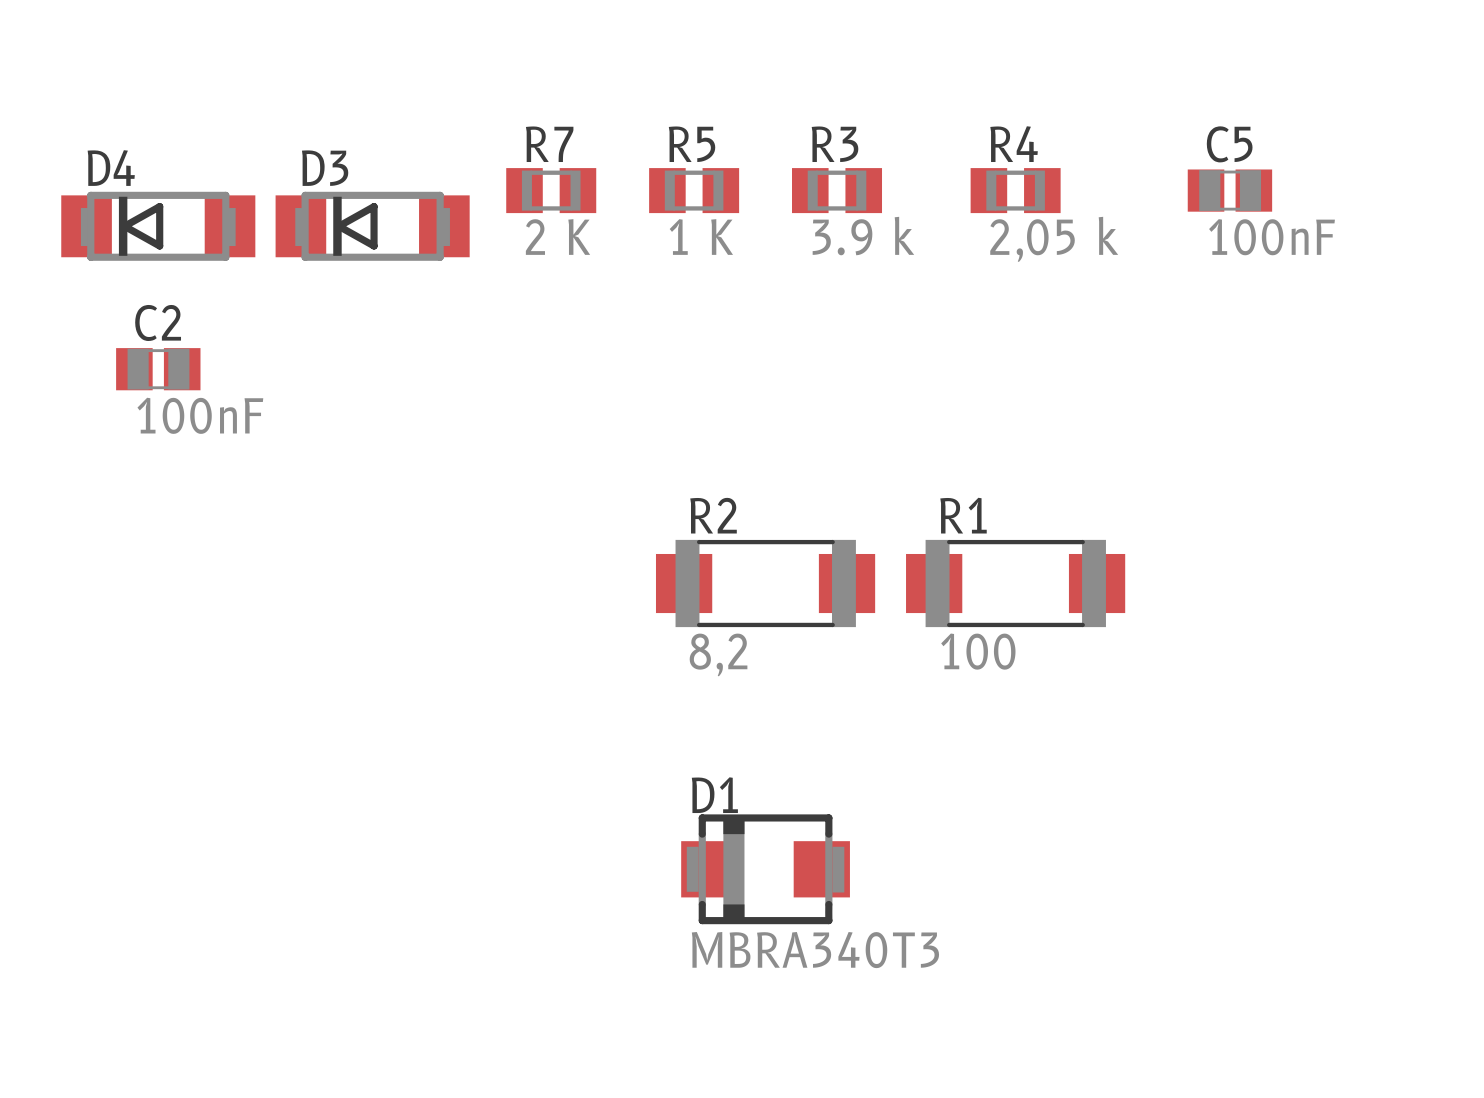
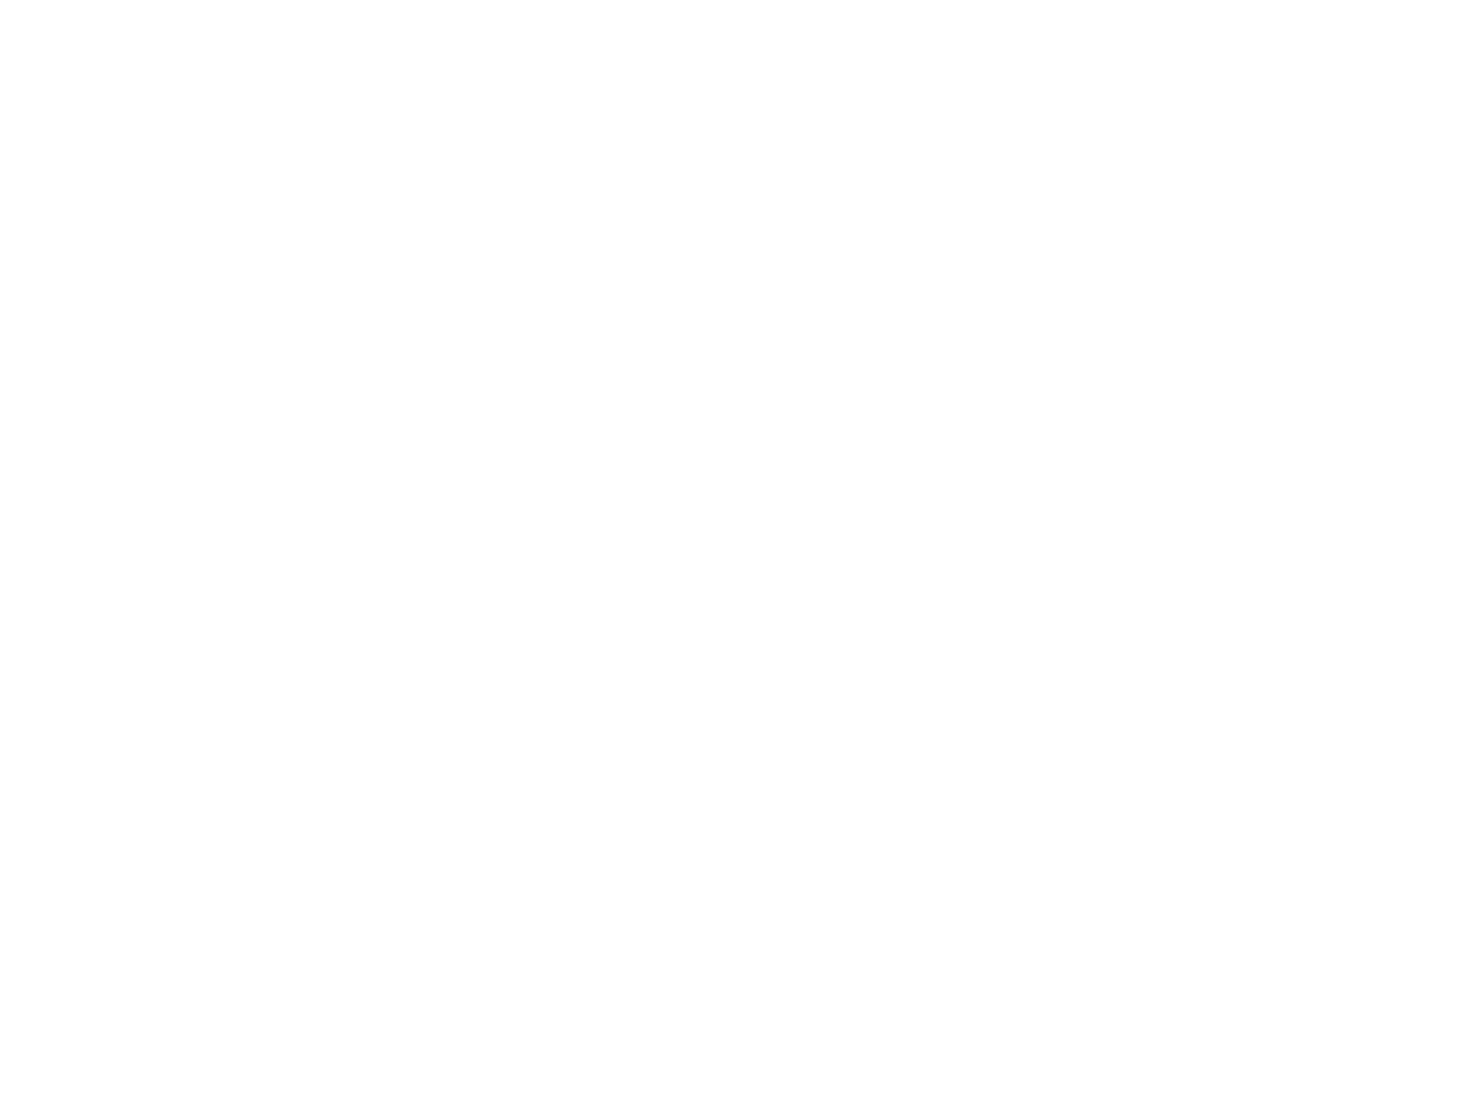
R7: 2 K (551, 190) -> none
R5: 1 K (694, 190) -> none
R3: 3.9 k (837, 190) -> none
R4: 2,05 k (1015, 190) -> none
C5: 100nF (1229, 190) -> none
D4: (158, 226) -> none
D3: (372, 226) -> none
C2: 100nF (158, 369) -> none
R2: 8,2 (765, 583) -> none
R1: 100 (1015, 583) -> none
D1: MBRA340T3 (765, 869) -> none

